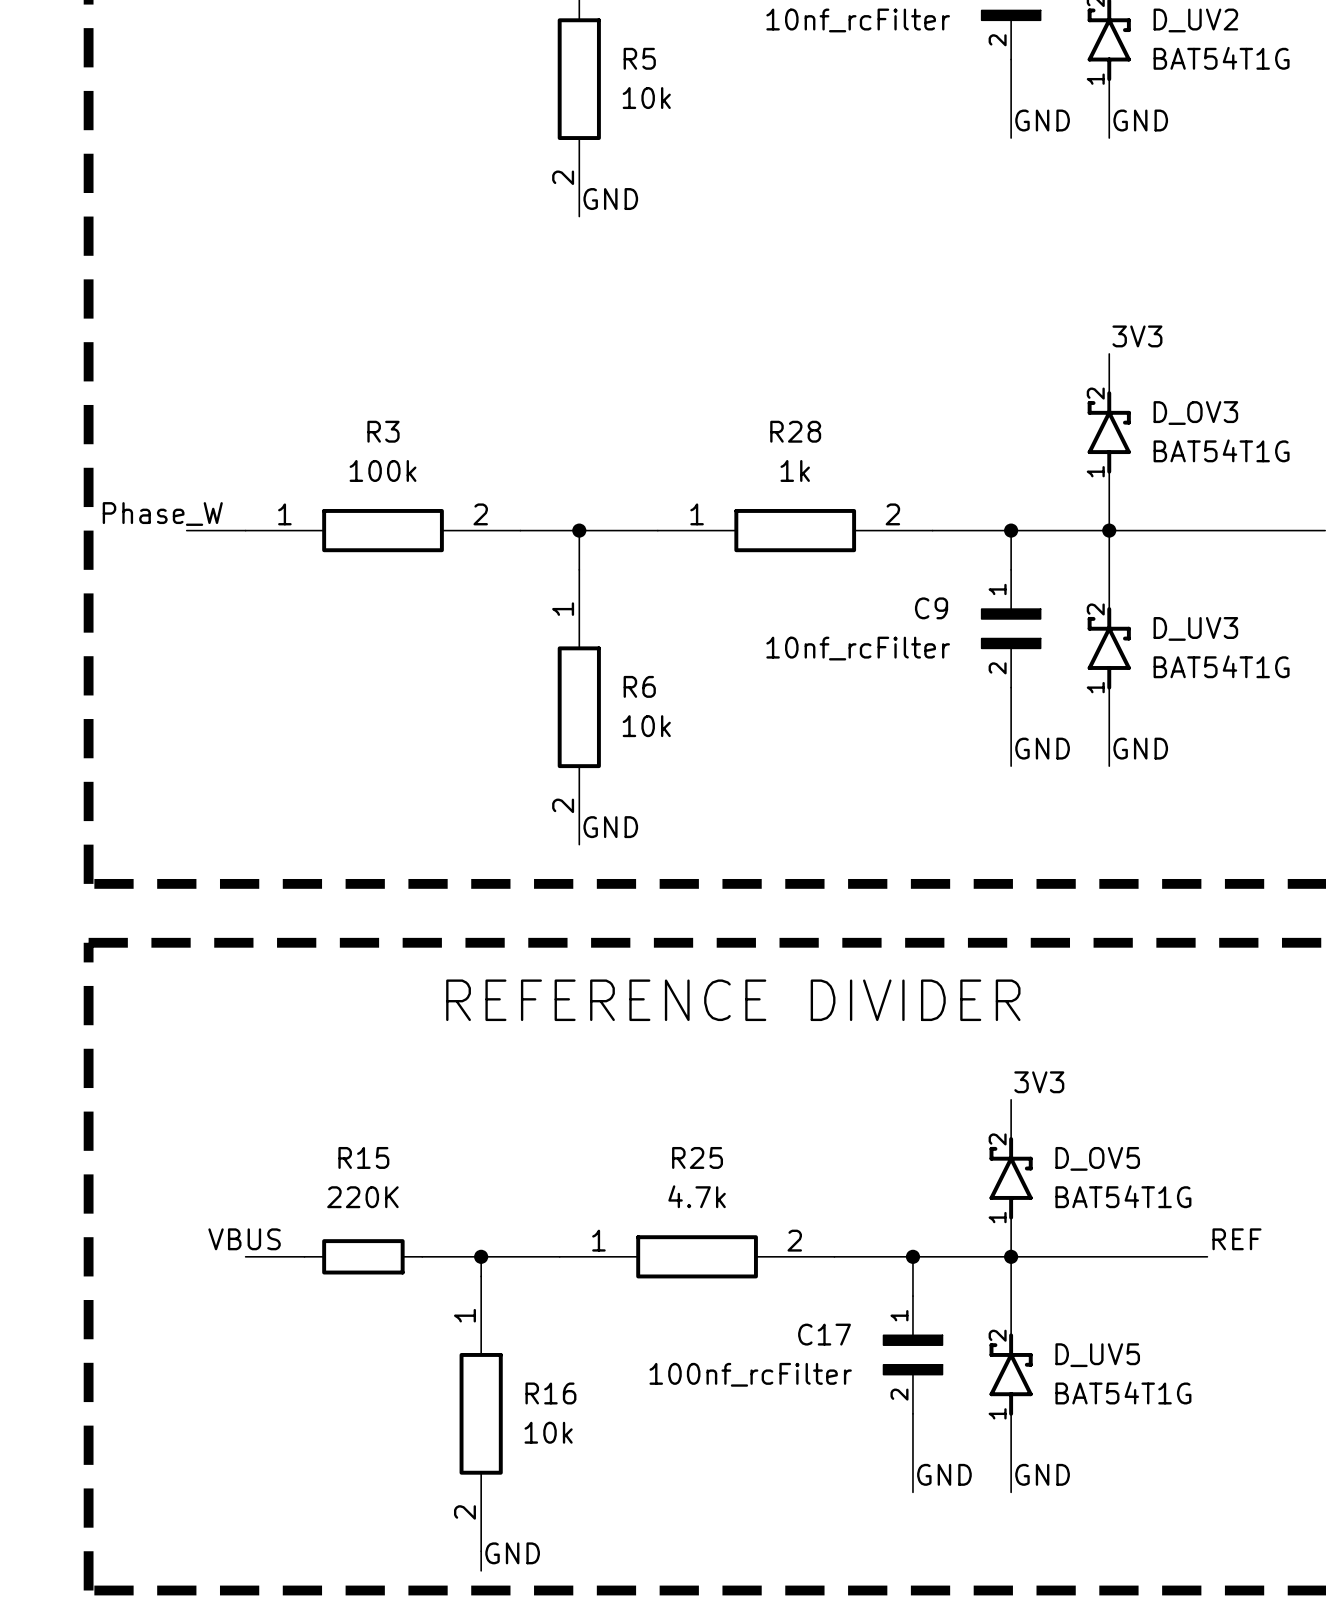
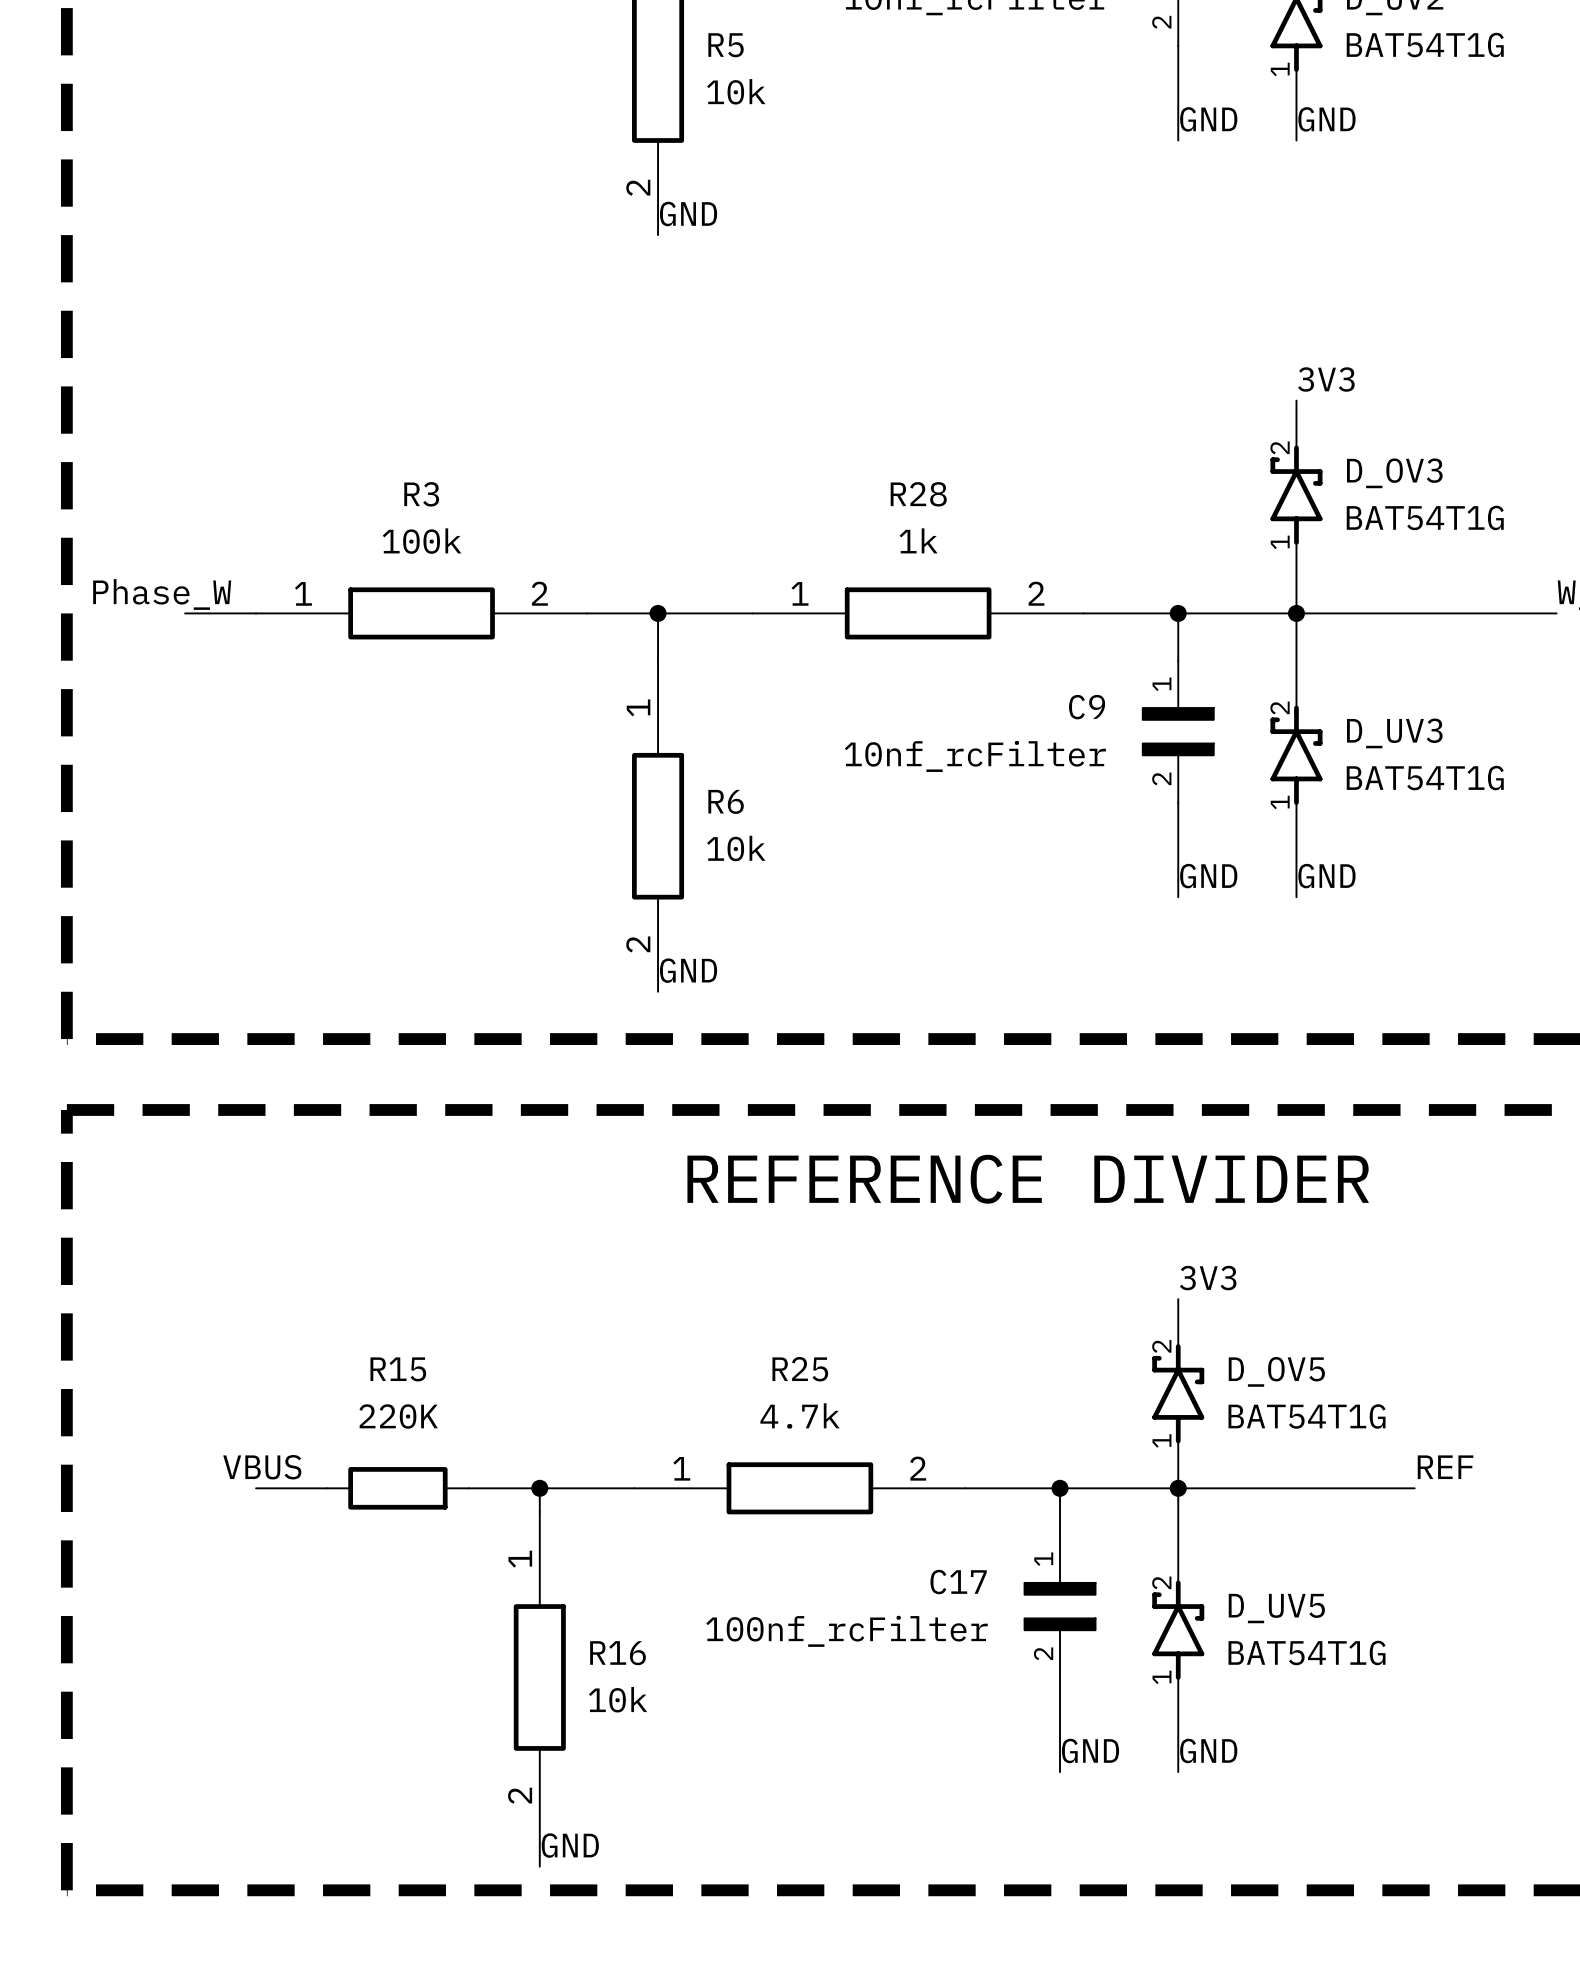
text position: REFERENCE DIVIDER (733, 1000) -> REFERENCE DIVIDER (1028, 1179)

